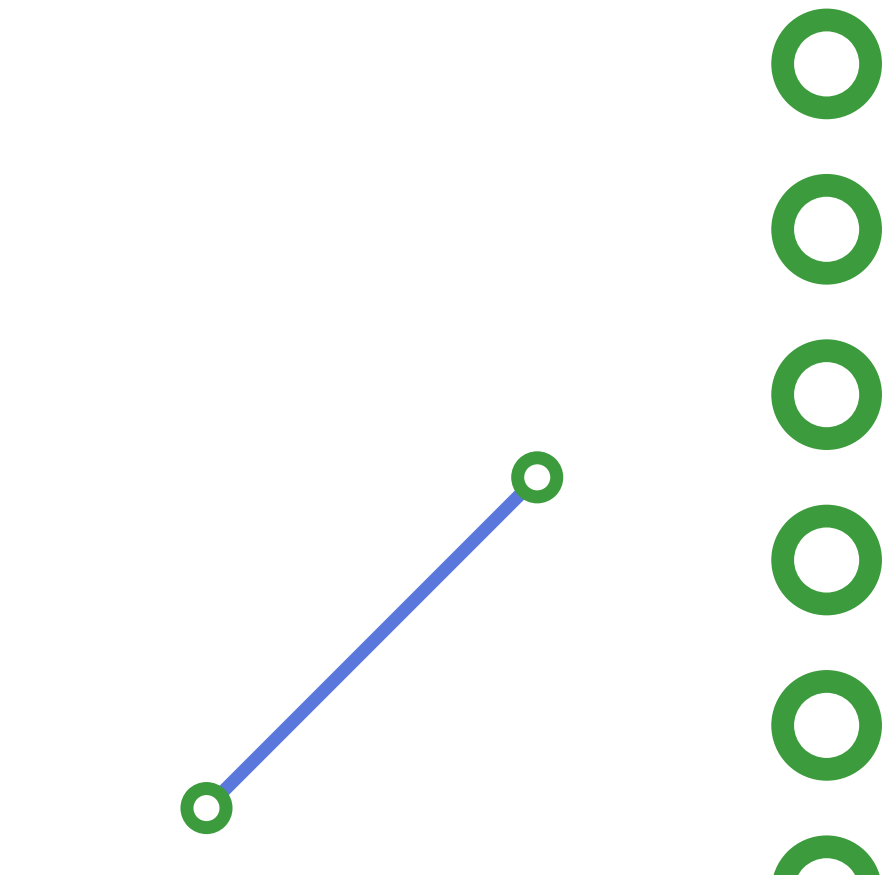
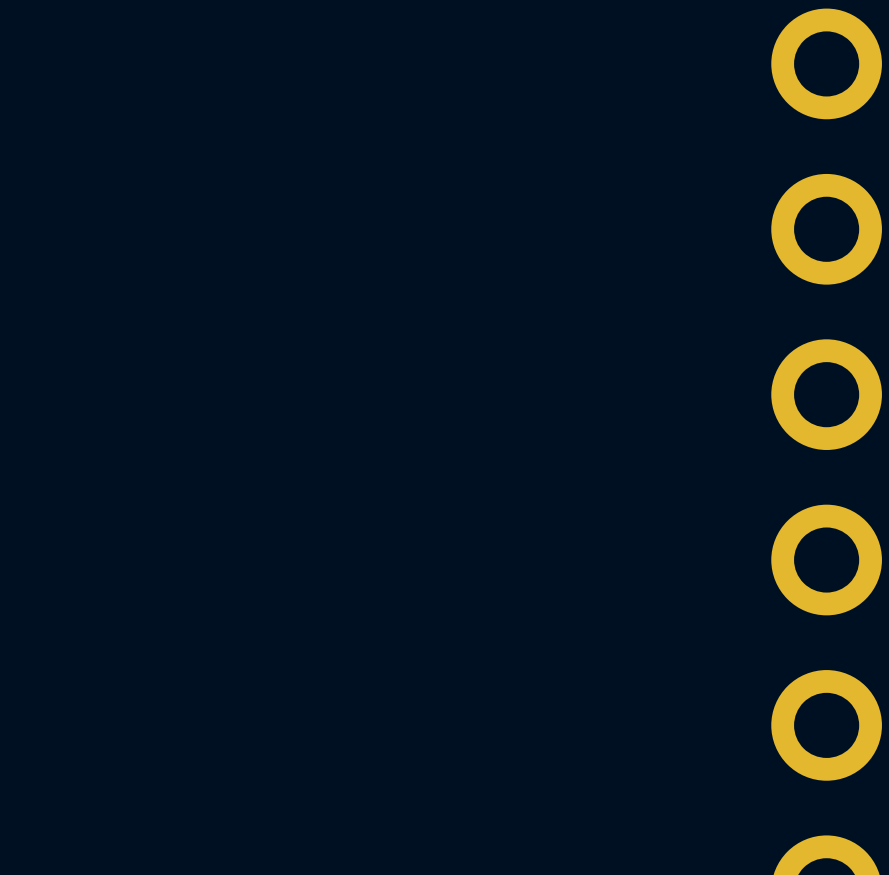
track: (537, 477) (206, 808) -> none
via: (537, 477) -> none
via: (206, 808) -> none

